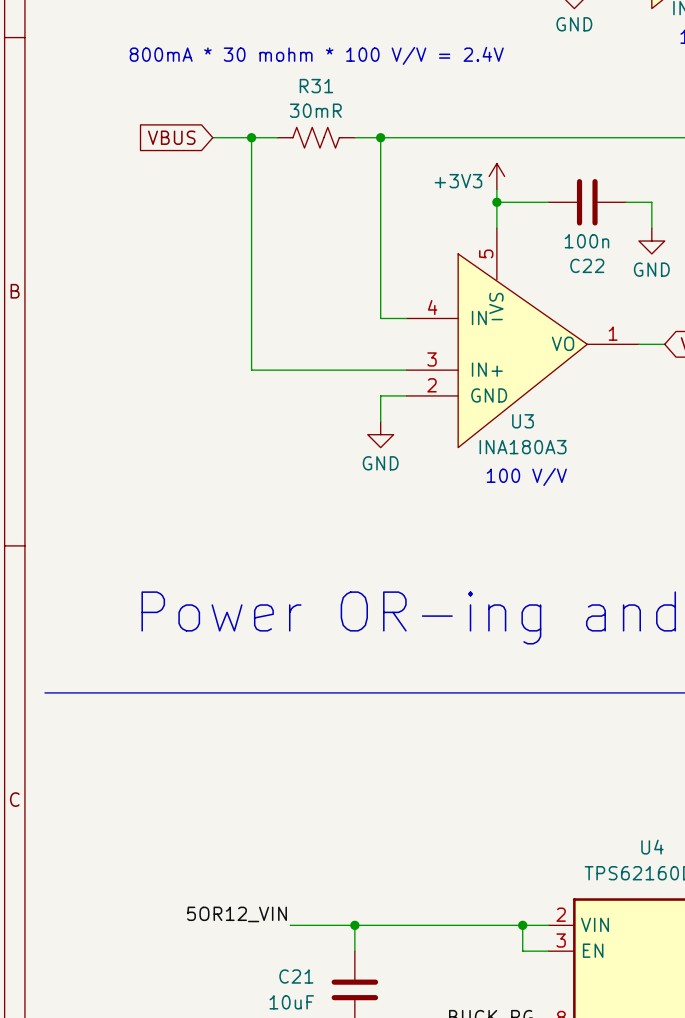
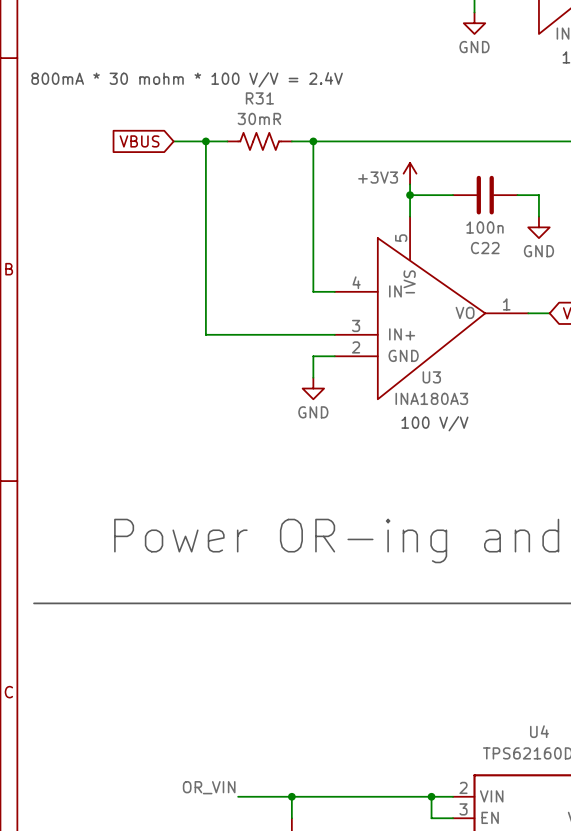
text position: 800mA * 30 mohm * 100 V/V = 2.4V (316, 55) -> 800mA * 30 mohm * 100 V/V = 2.4V (187, 79)
label: 5OR12_VIN (237, 914) -> OR_VIN (209, 787)

